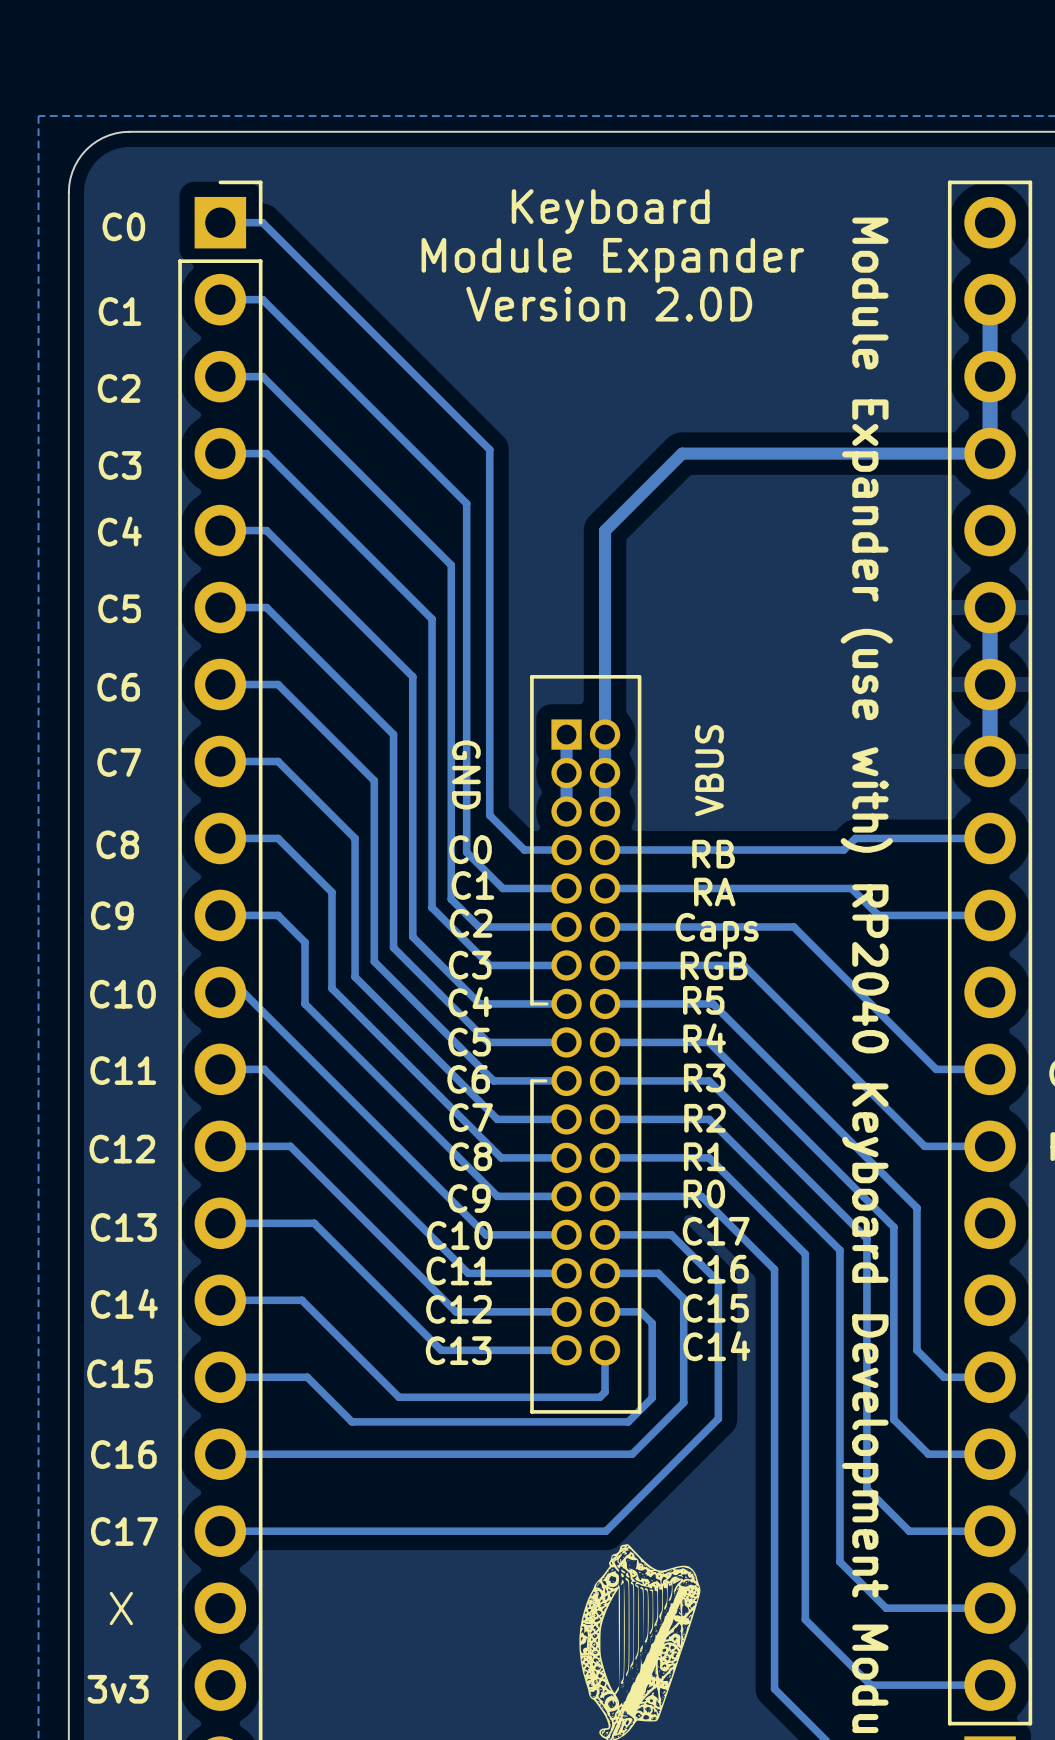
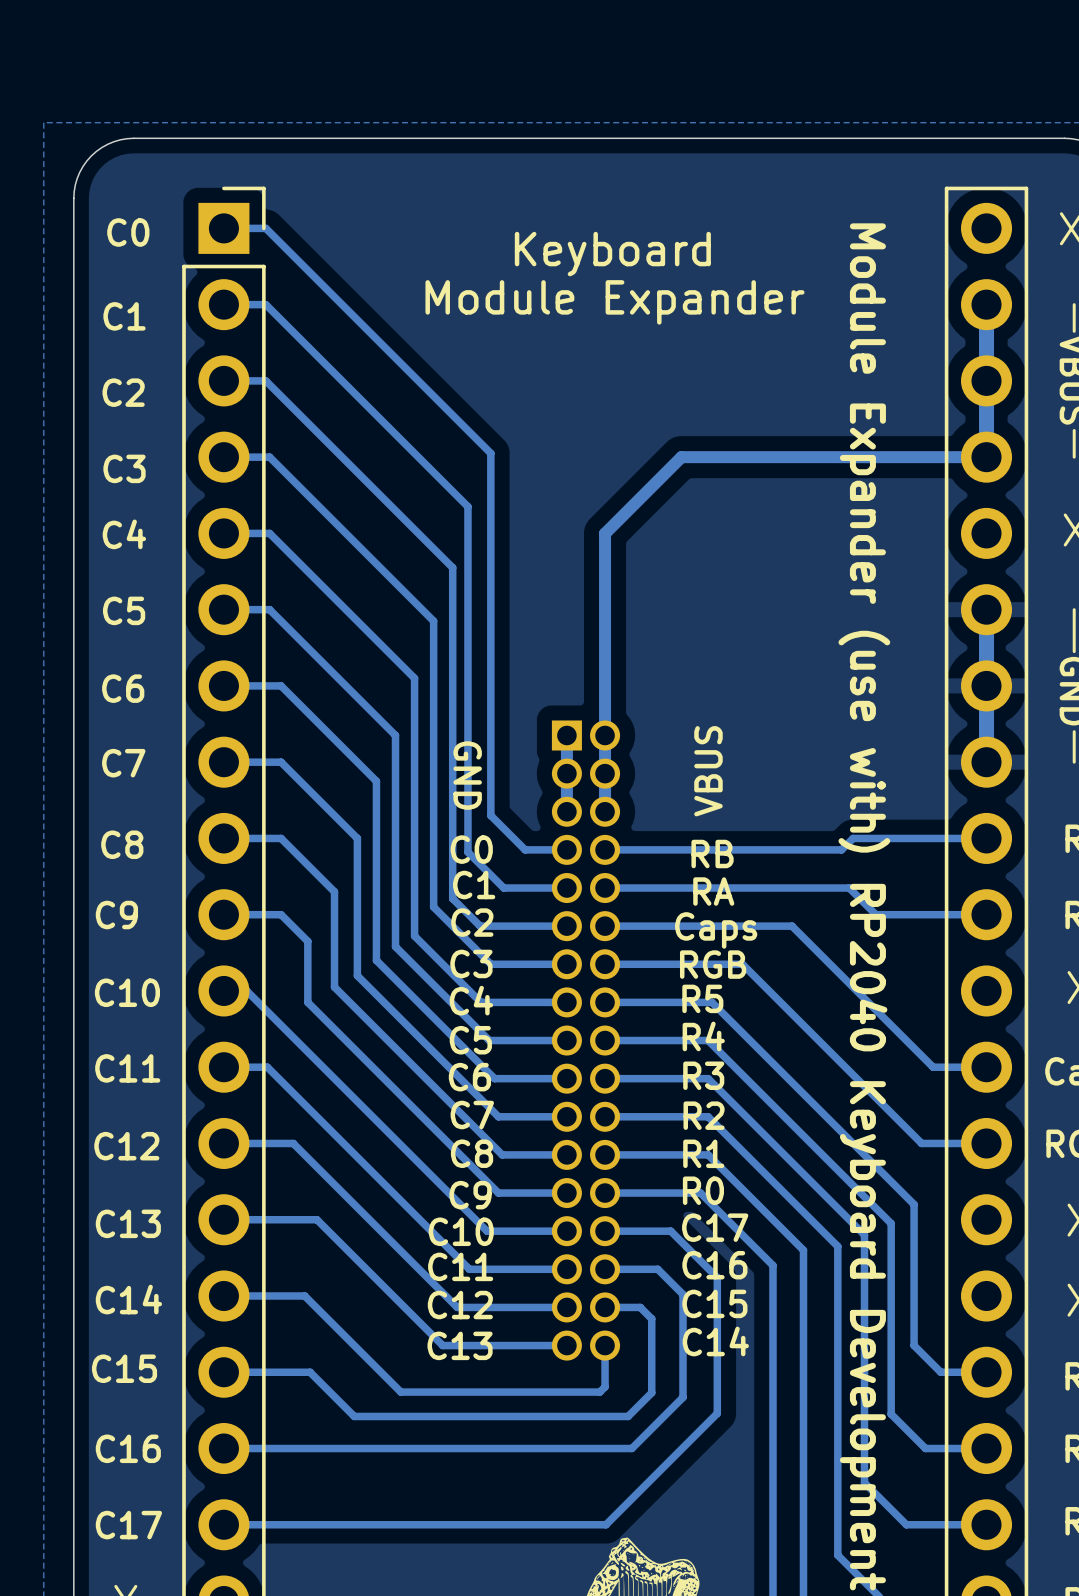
text position: Keyboard (610, 211) -> Keyboard (612, 254)
text position: Module Expander (612, 260) -> Module Expander (614, 302)
text: Version 2.0D (609, 304) -> none
part footprint: [530, 675, 642, 1414] -> [551, 720, 621, 1361]

